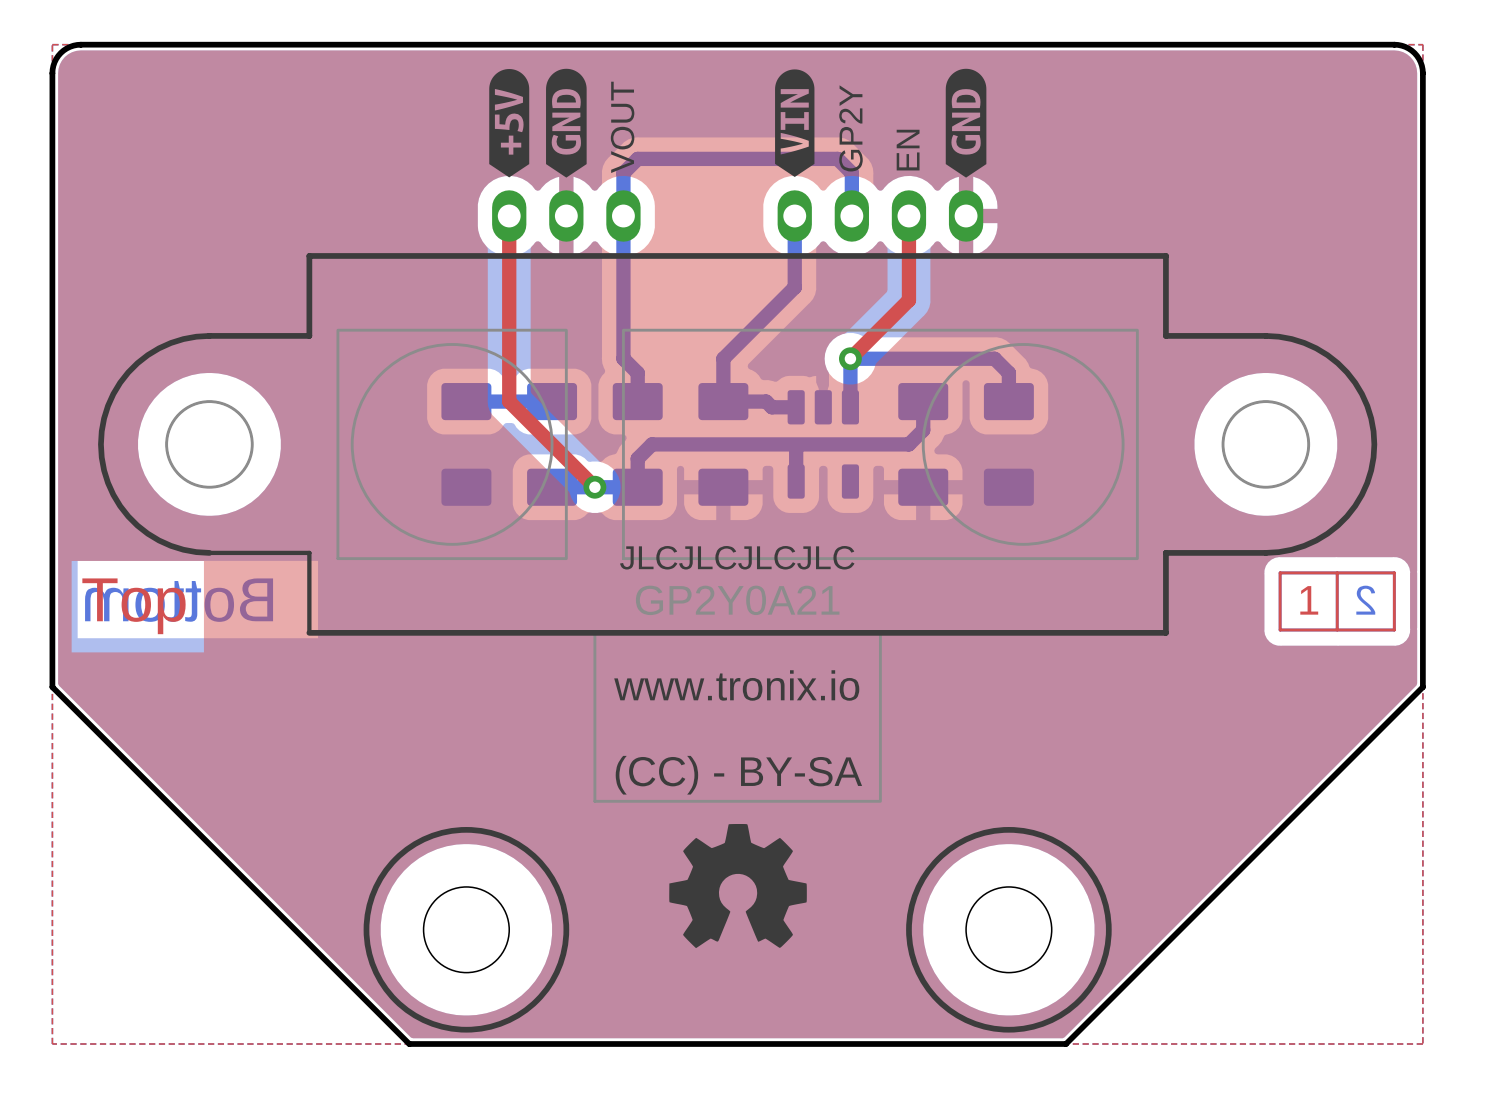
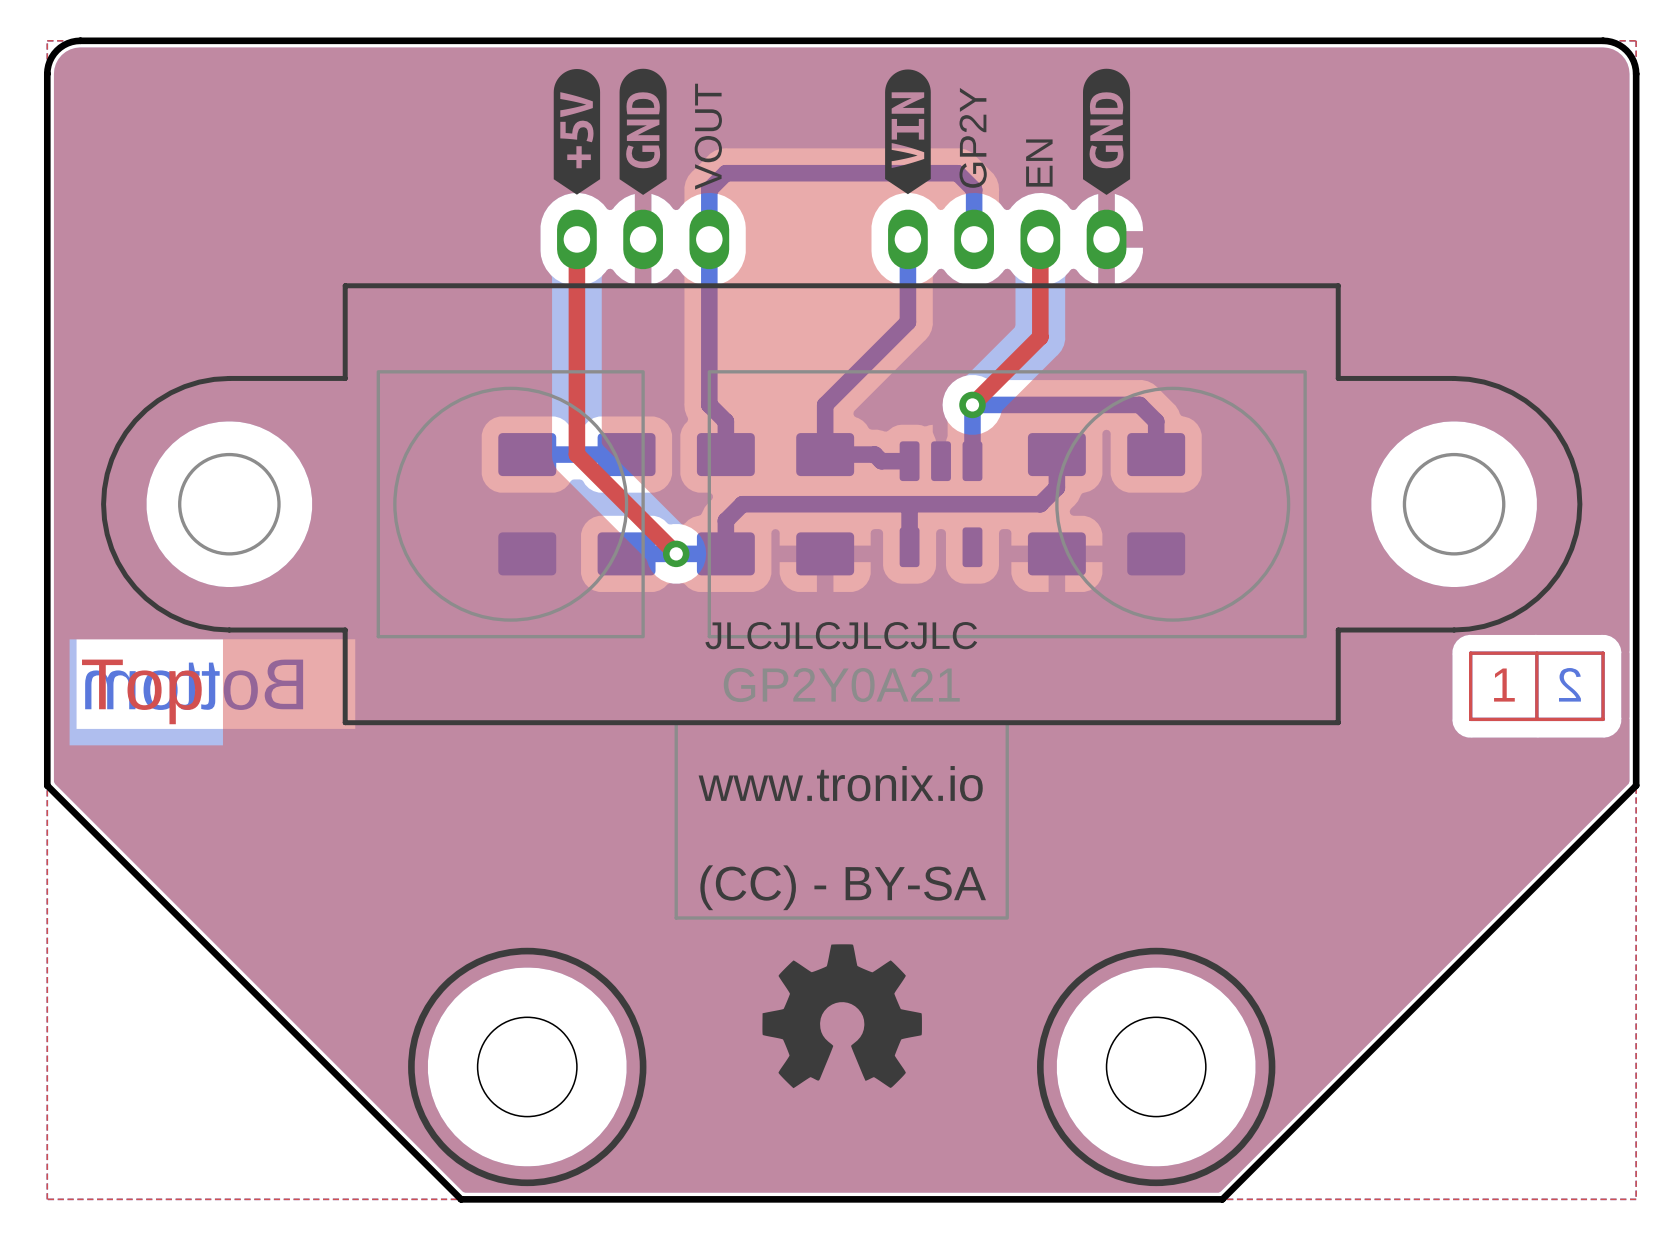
part footprint: [98, 253, 1378, 803] -> [101, 283, 1583, 920]

